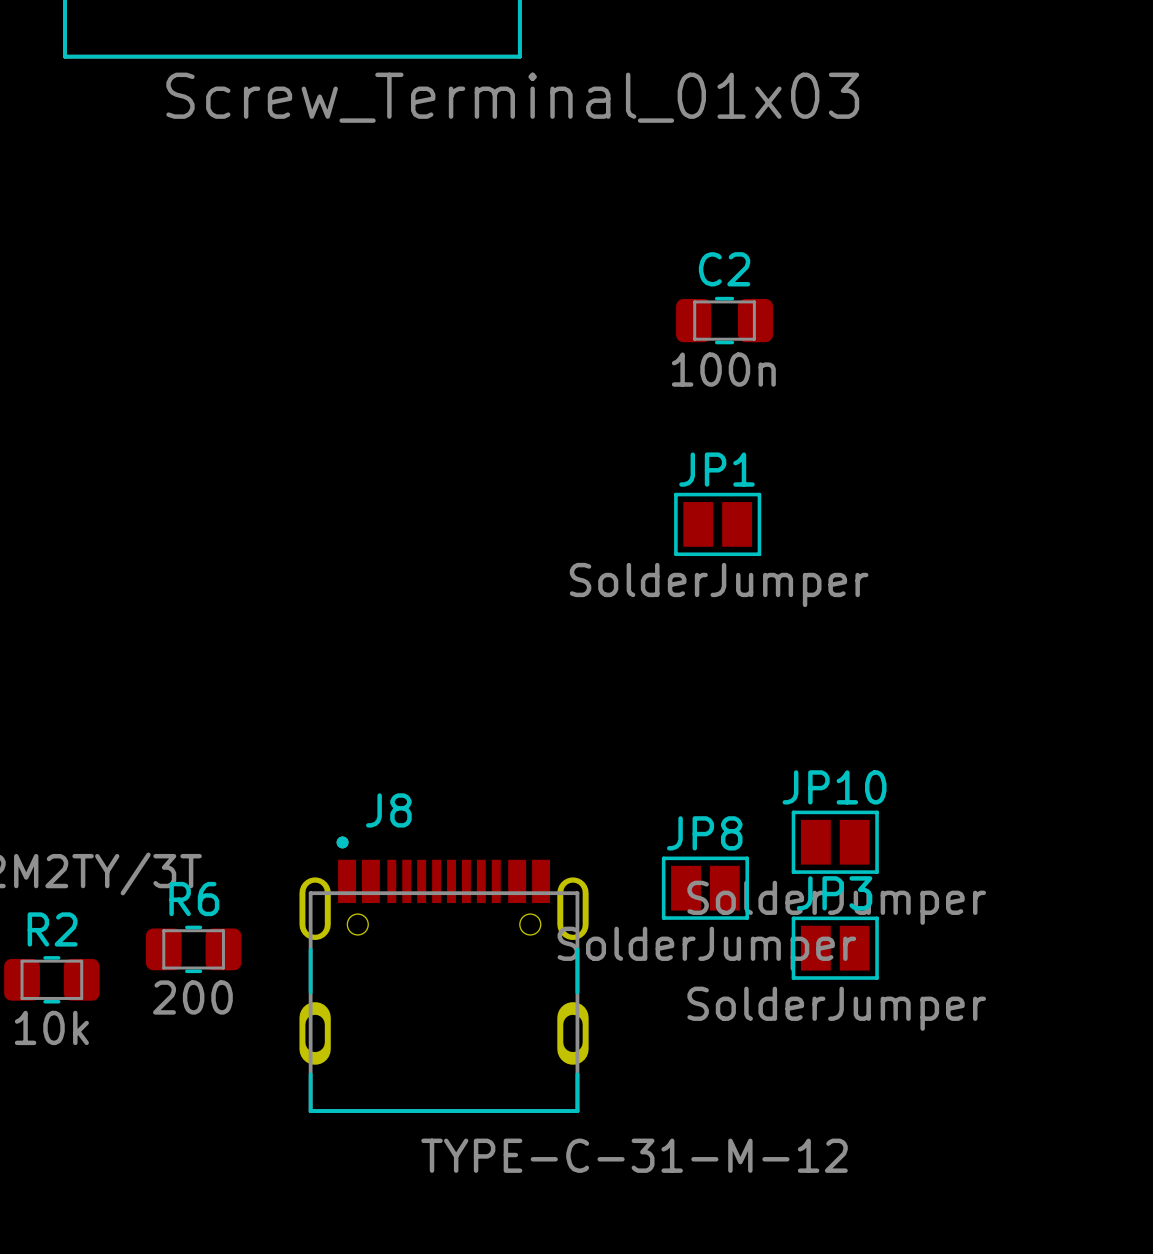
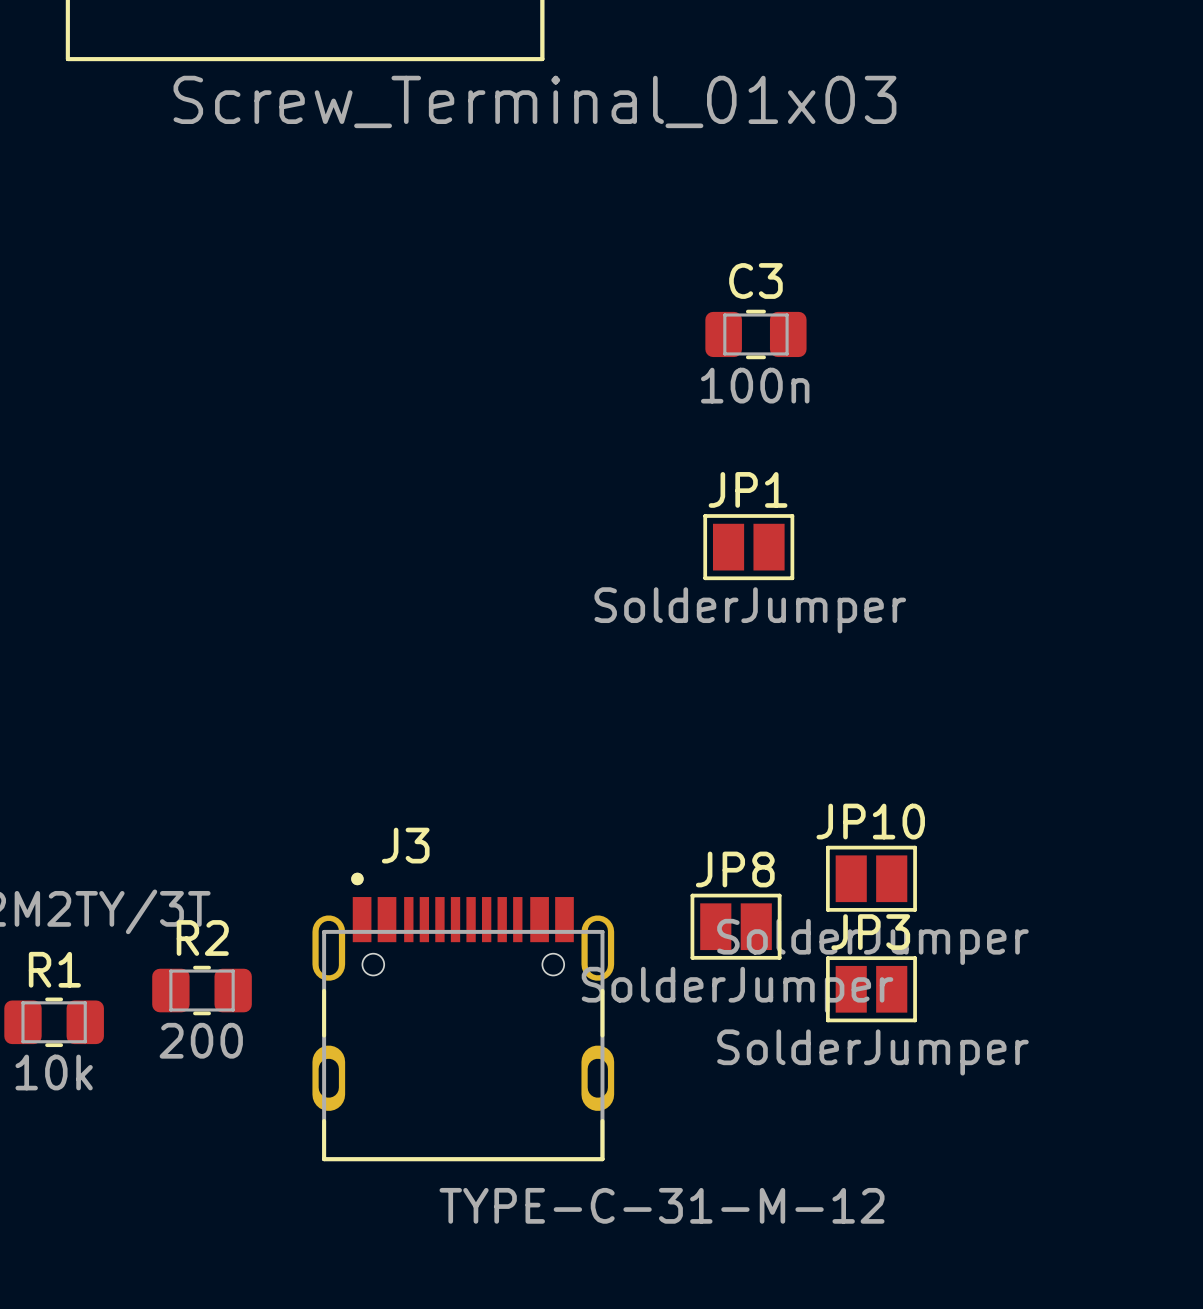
C2 name: C2 (724, 269) -> C3 (755, 280)
J8 name: J8 (388, 810) -> J3 (405, 845)
R6 name: R6 (194, 899) -> R2 (202, 937)
R2 name: R2 (52, 929) -> R1 (54, 969)

